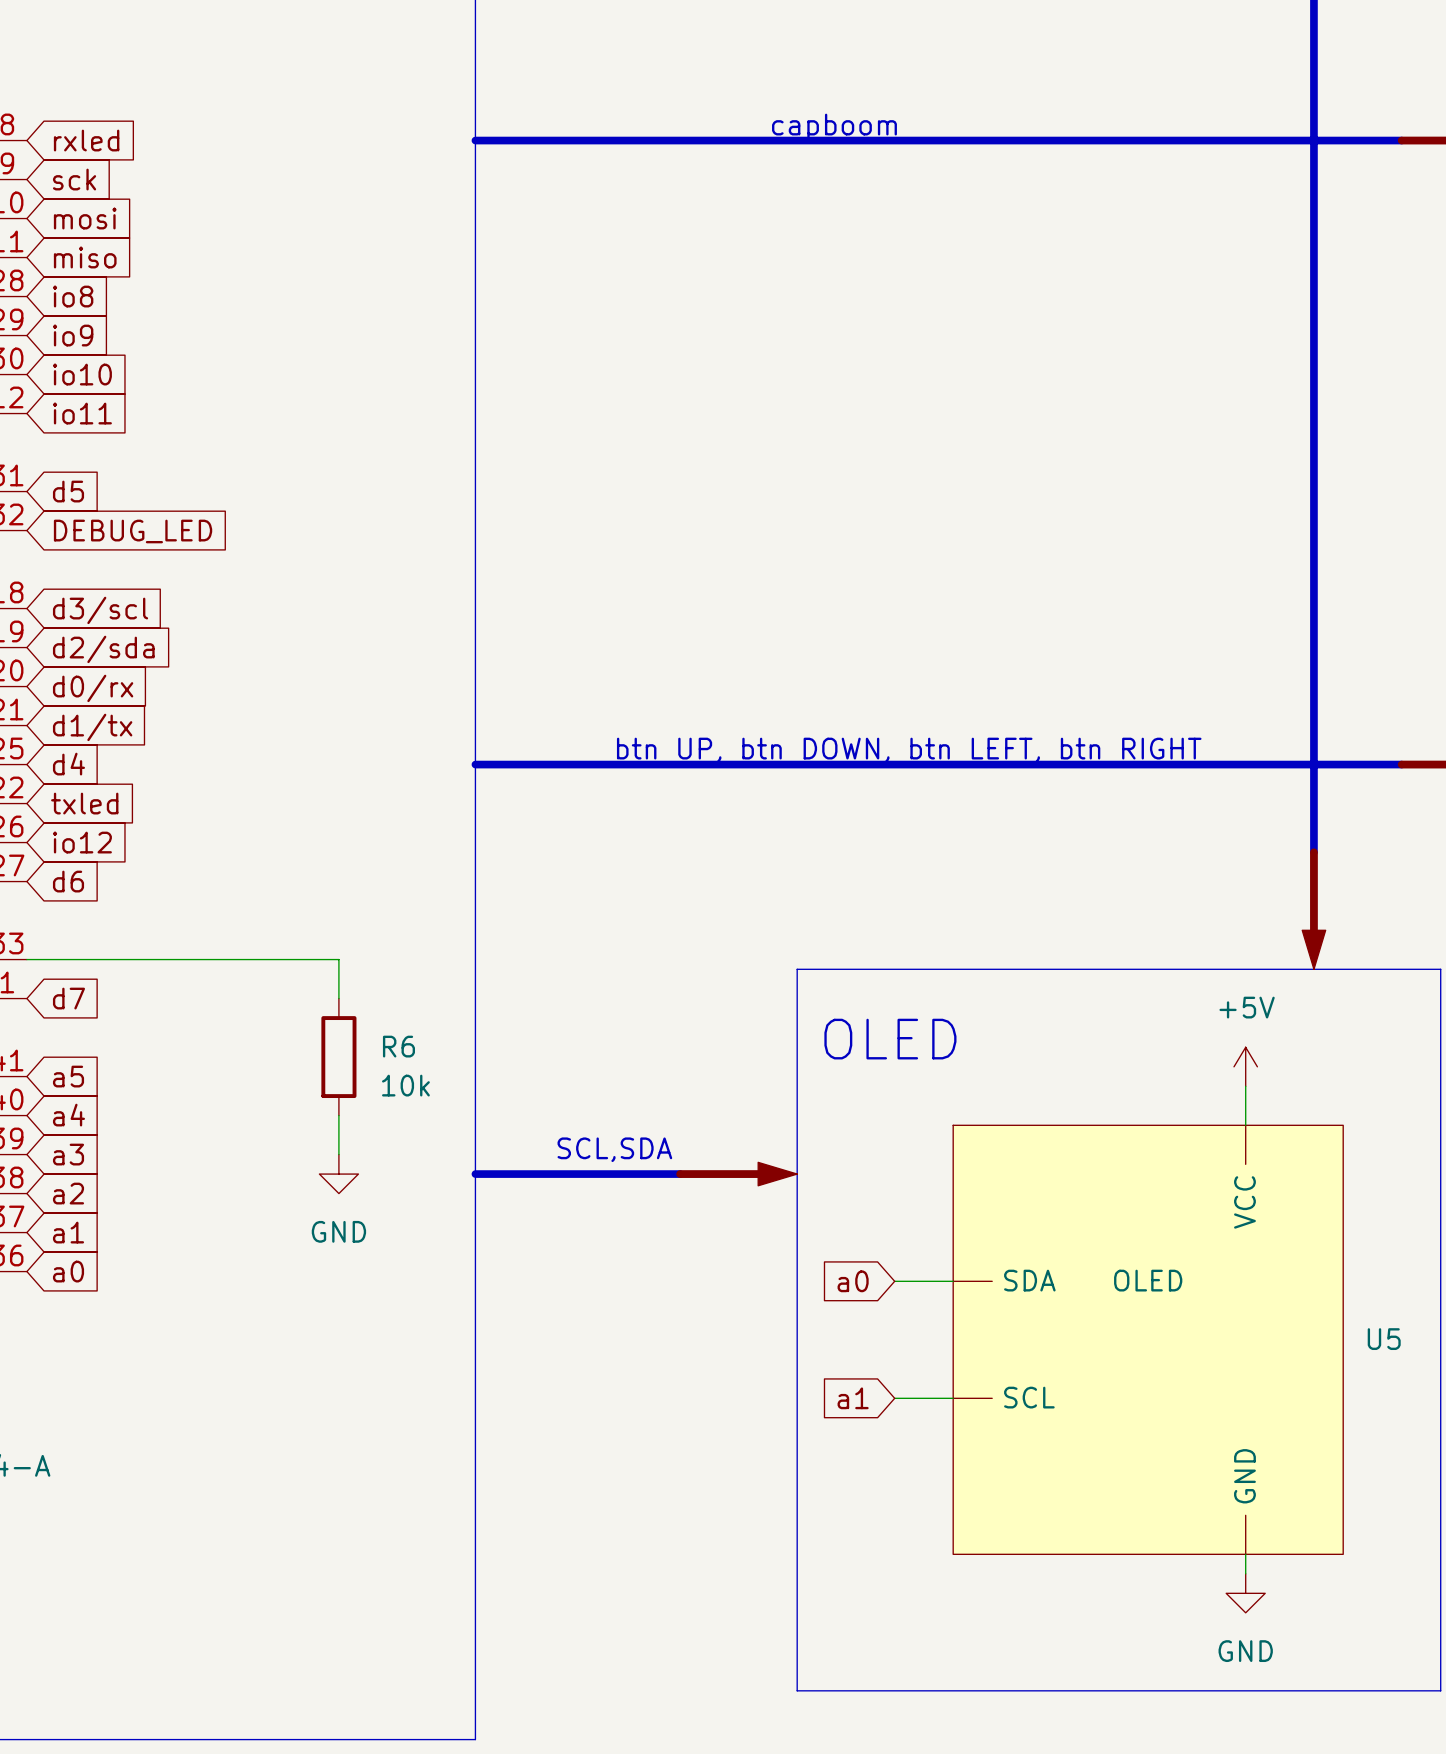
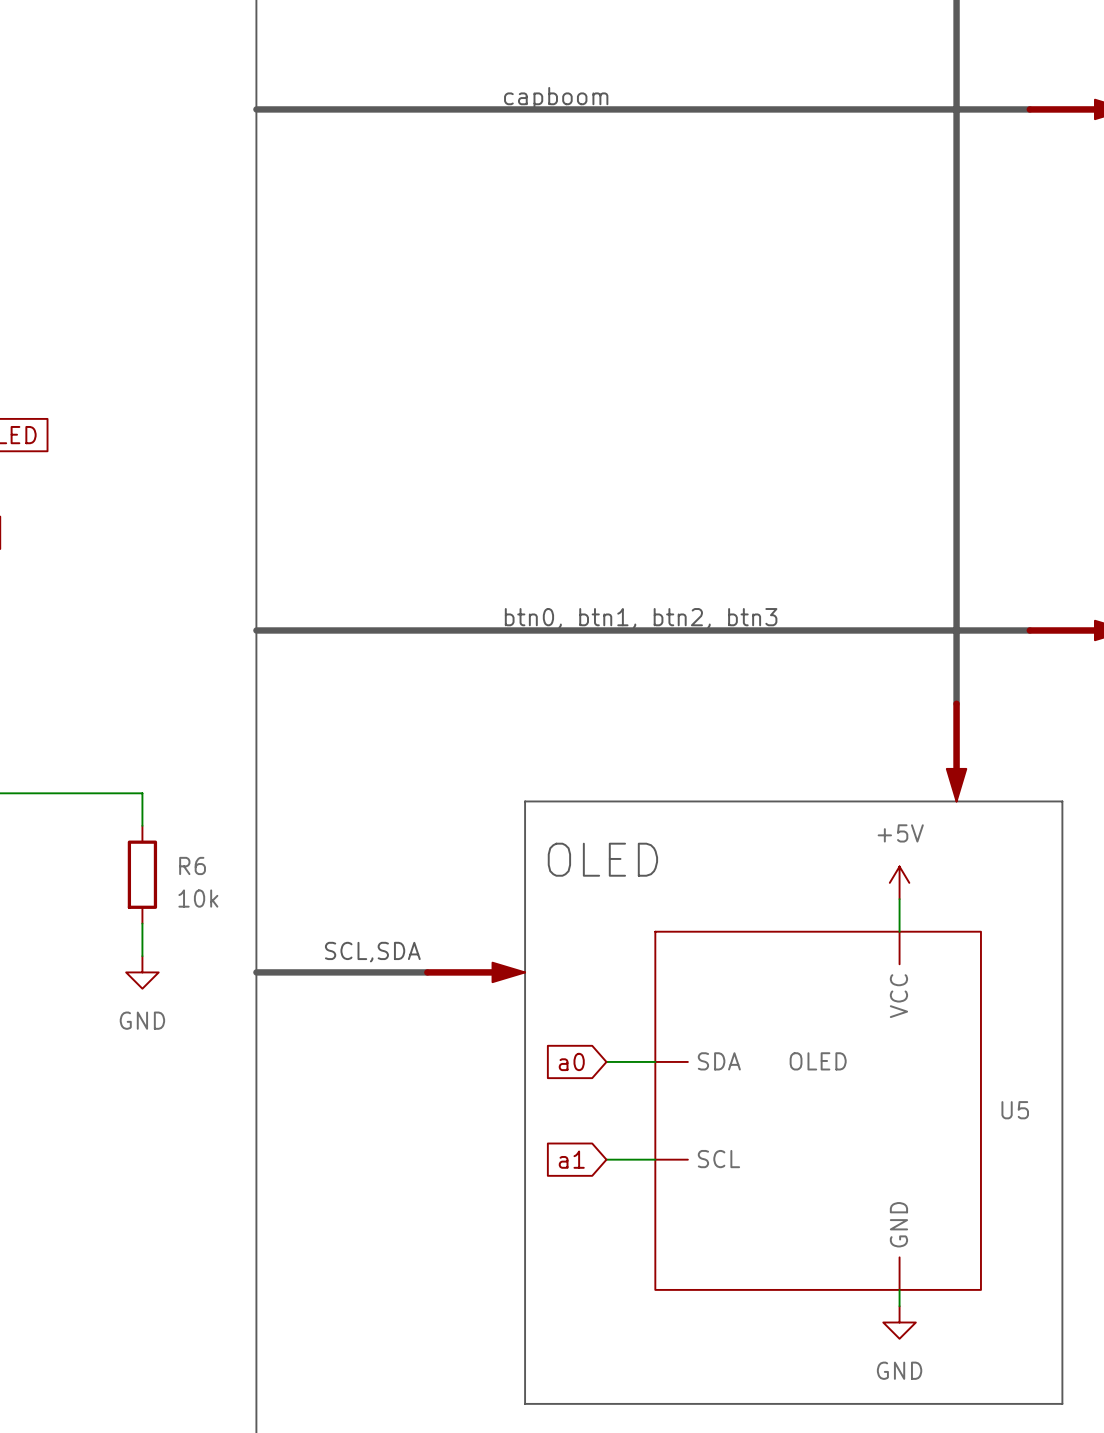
text: btn UP, btn DOWN, btn LEFT, btn RIGHT (909, 749) -> btn0, btn1, btn2, btn3 (641, 618)

